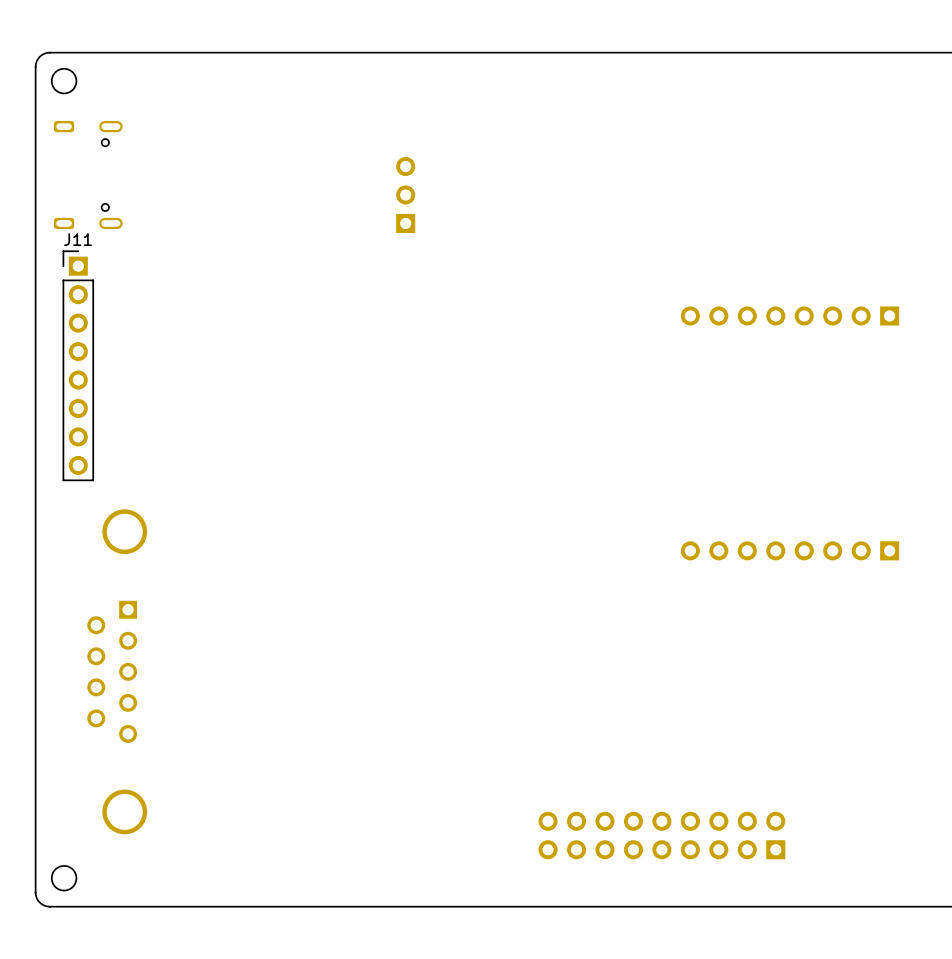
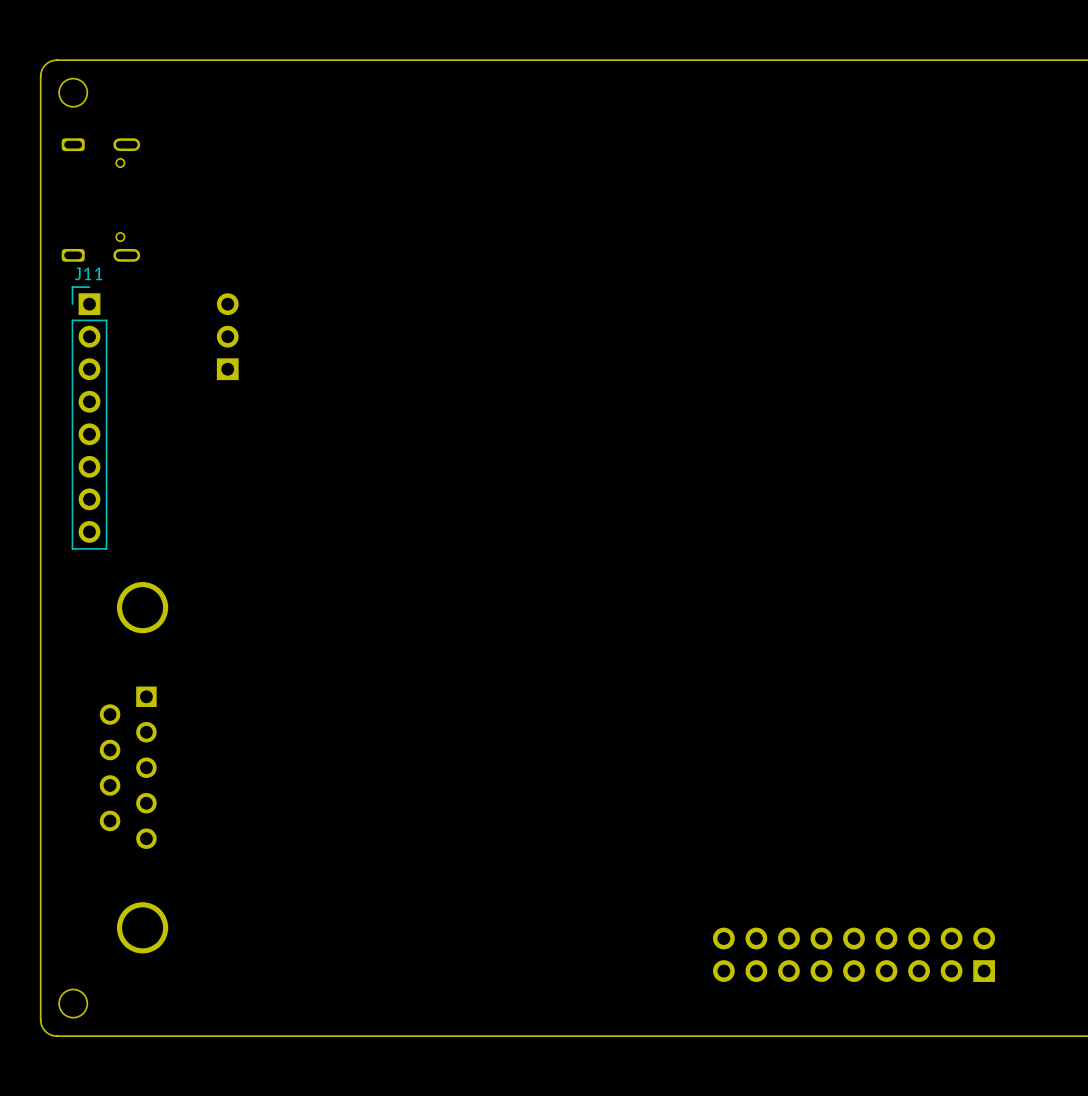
part position: (405, 194) -> (227, 336)
part: (790, 315) -> none
part: (790, 550) -> none
part position: (661, 835) -> (853, 954)

